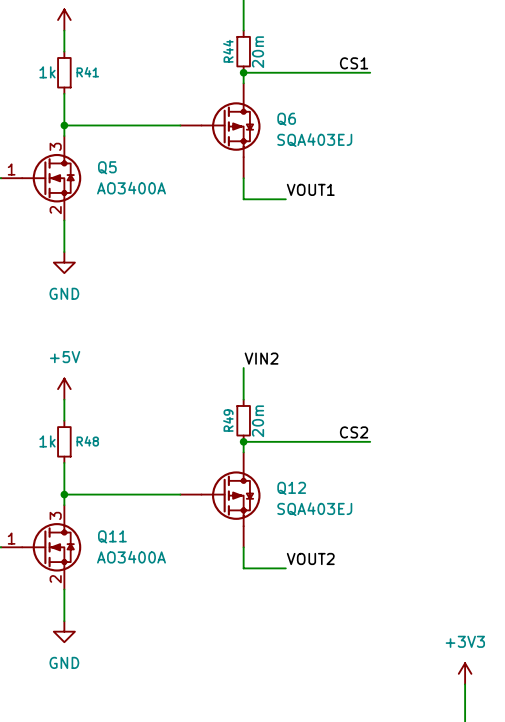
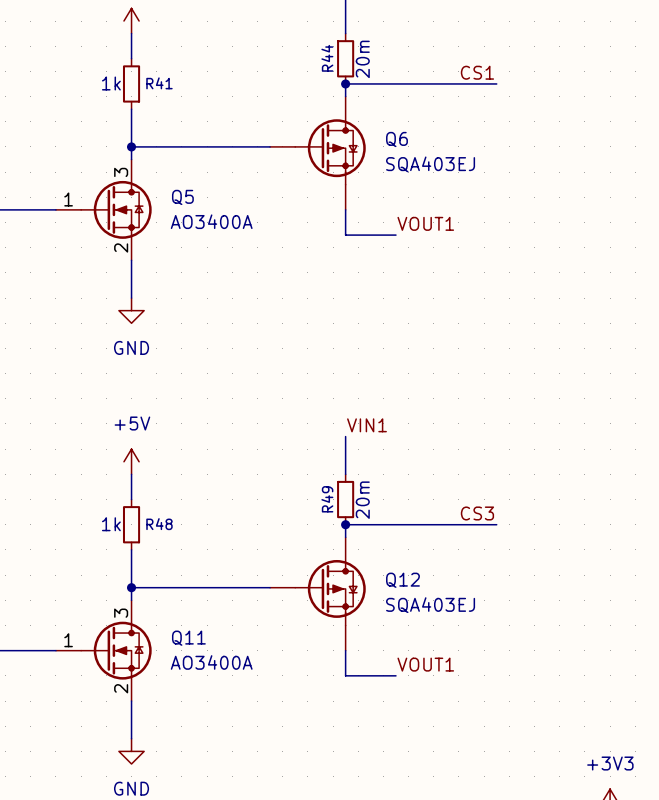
label: VIN2 (261, 358) -> VIN1 (366, 425)
label: CS2 (354, 432) -> CS3 (477, 513)
label: VOUT2 (310, 558) -> VOUT1 (425, 664)

